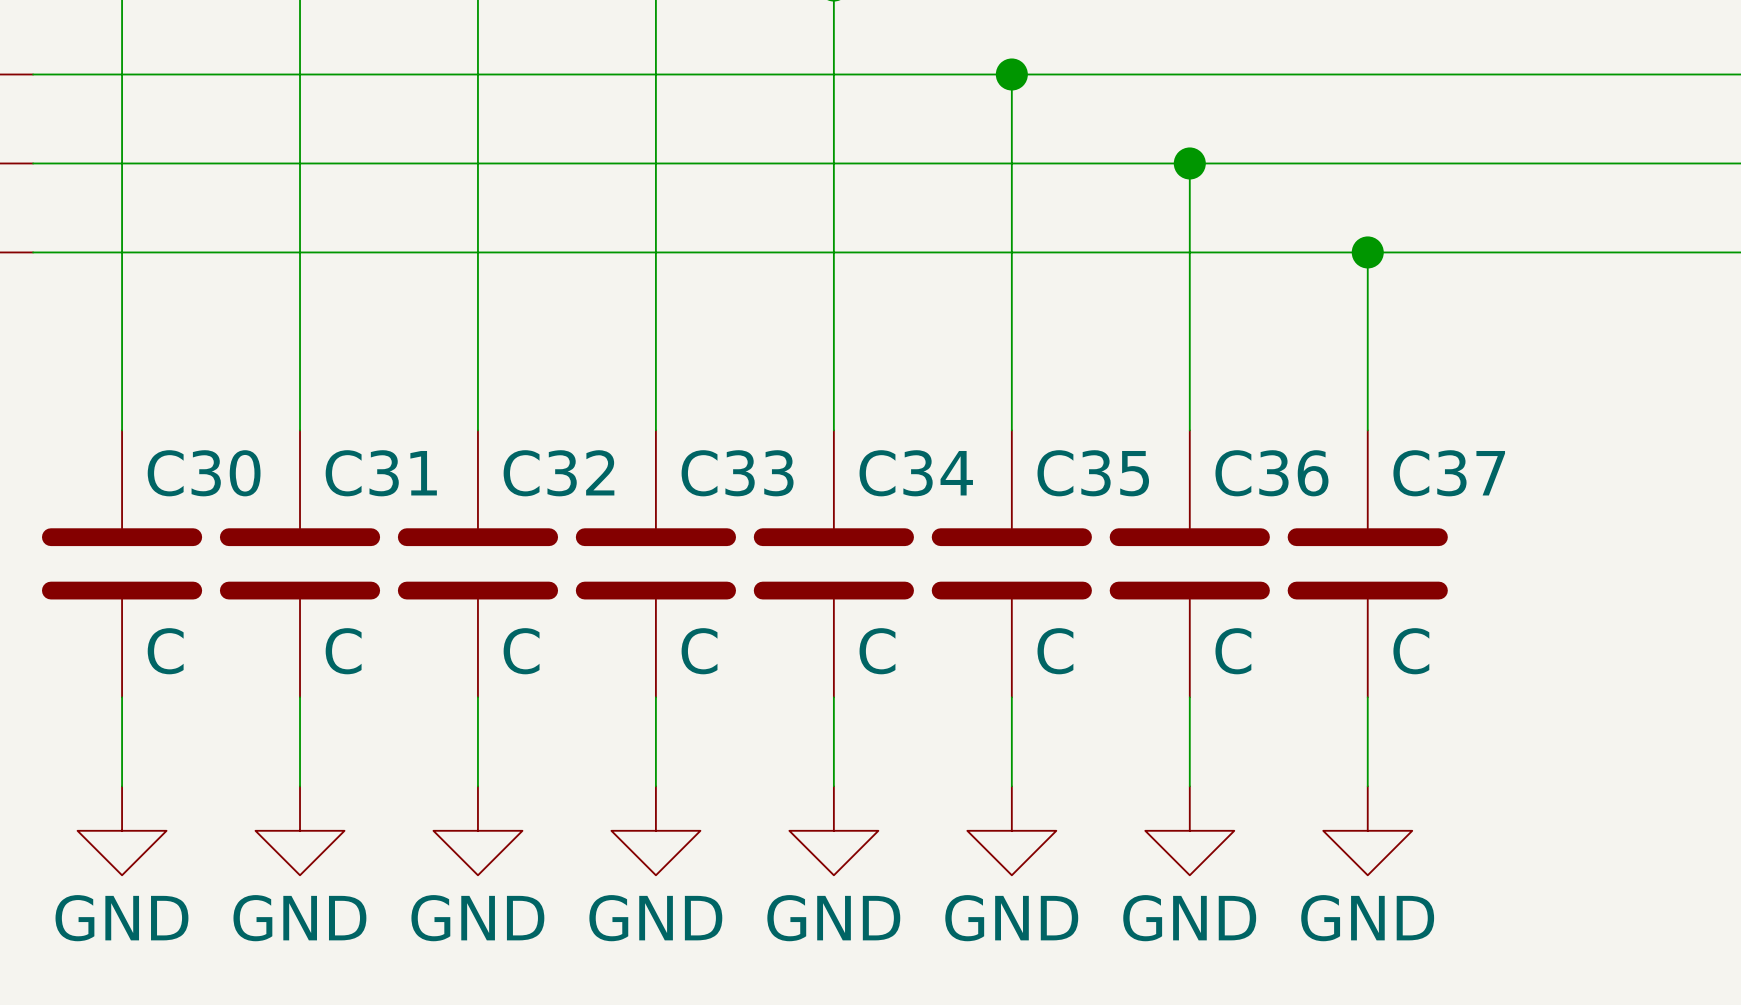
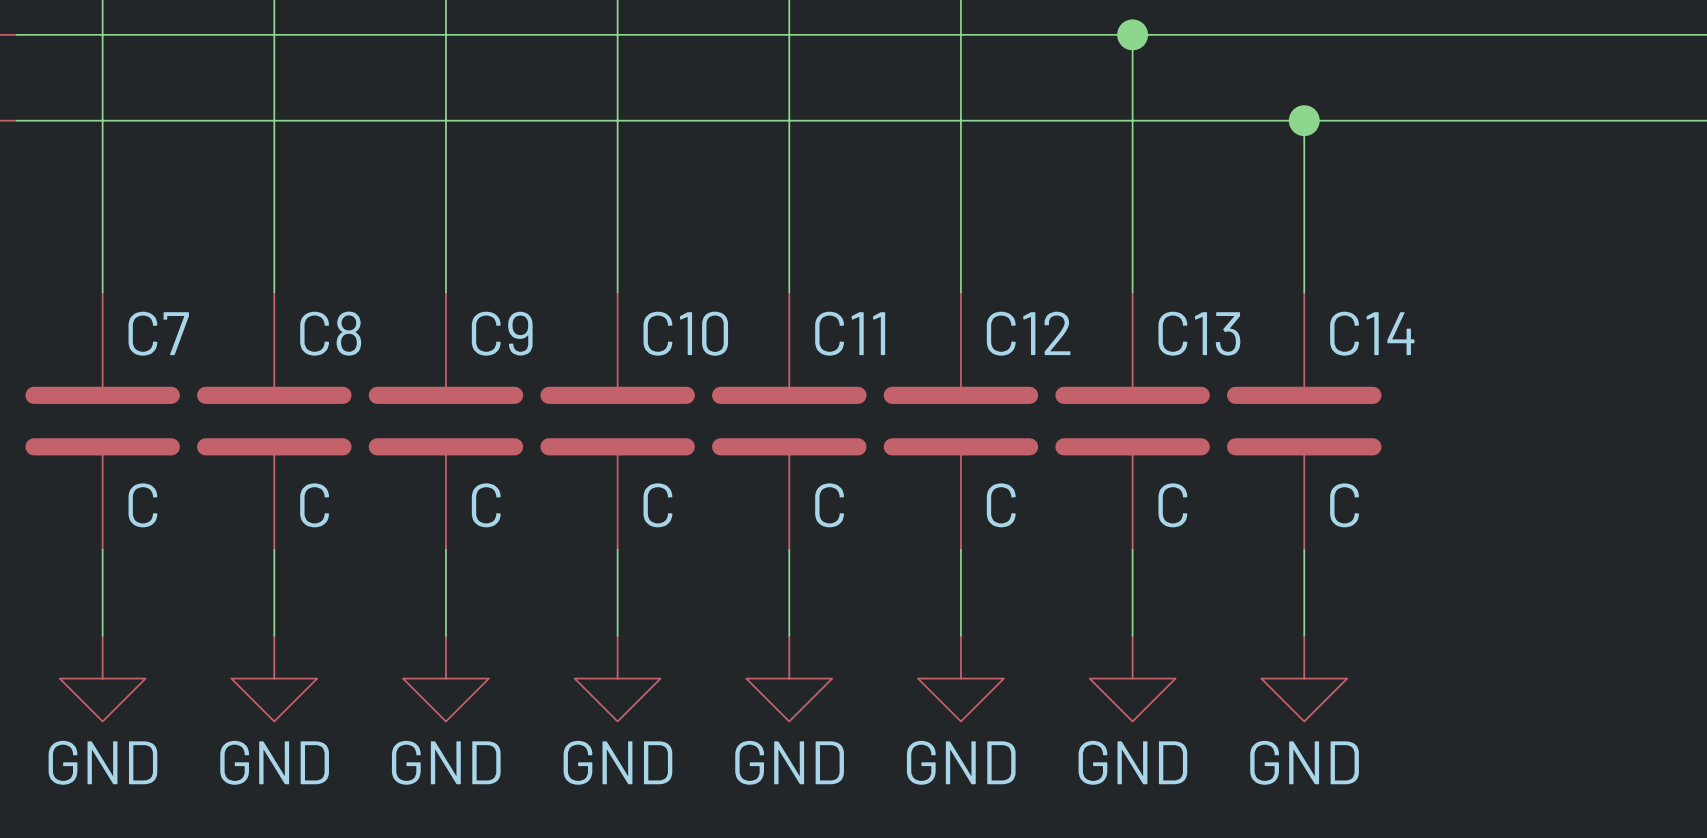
C30 name: C30 (204, 473) -> C7 (158, 333)
C31 name: C31 (381, 473) -> C8 (330, 333)
C32 name: C32 (559, 473) -> C9 (502, 333)
C33 name: C33 (737, 473) -> C10 (685, 333)
C34 name: C34 (916, 473) -> C11 (850, 333)
C35 name: C35 (1093, 473) -> C12 (1028, 333)
C36 name: C36 (1271, 473) -> C13 (1199, 333)
C37 name: C37 (1449, 473) -> C14 (1372, 333)

